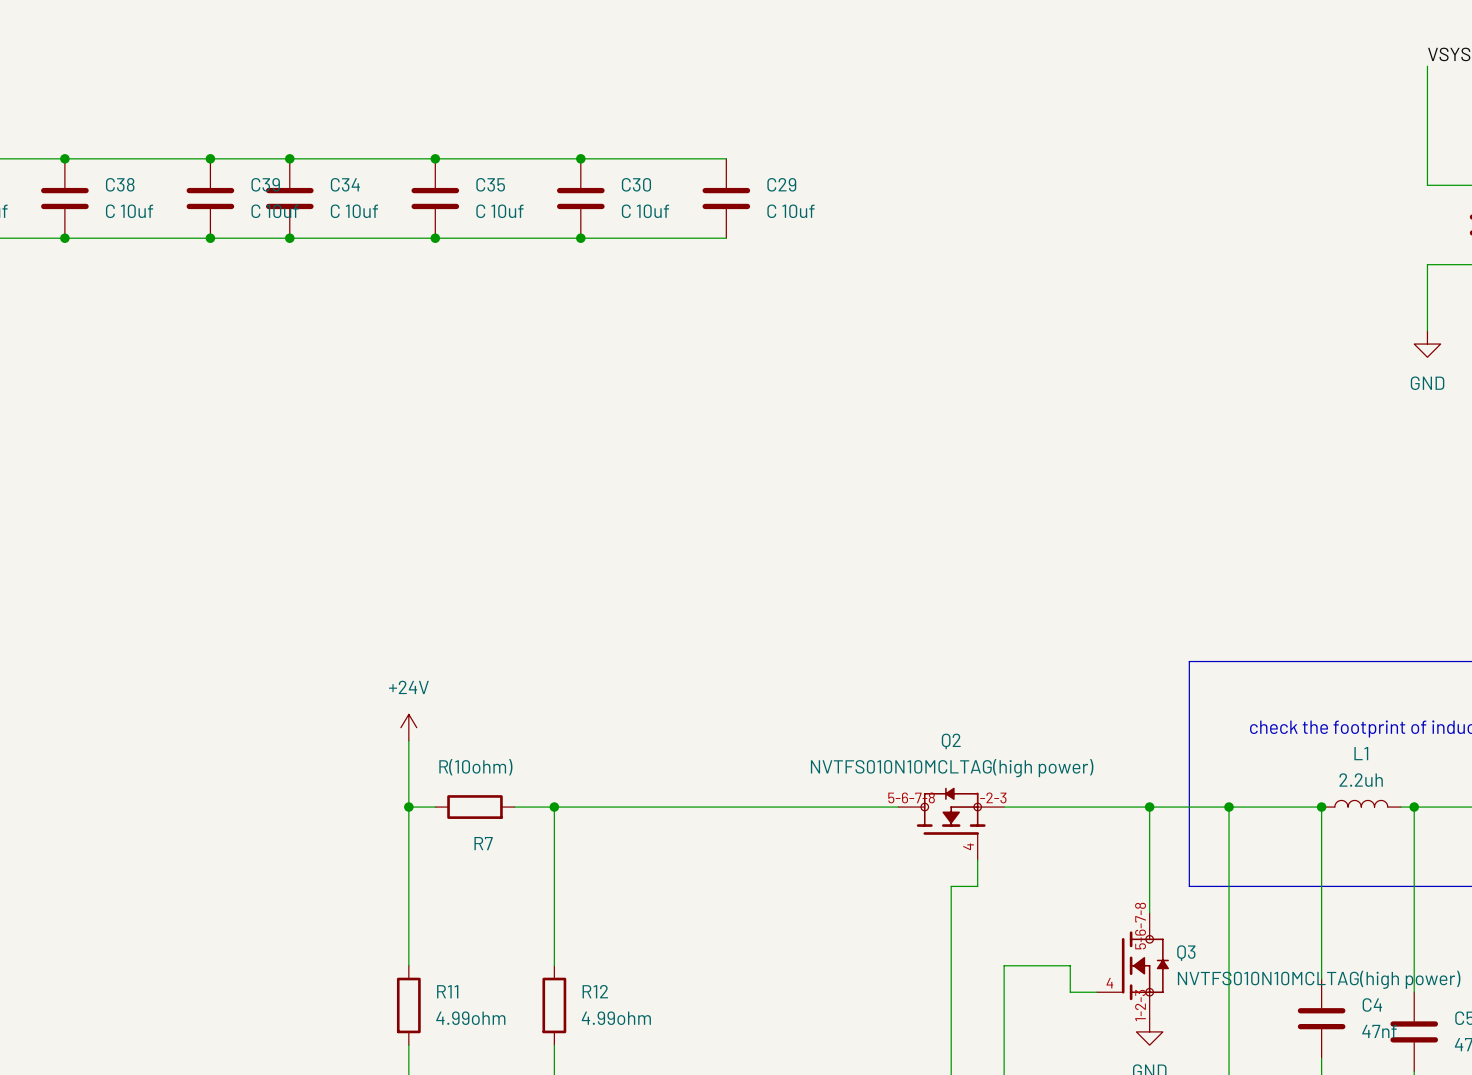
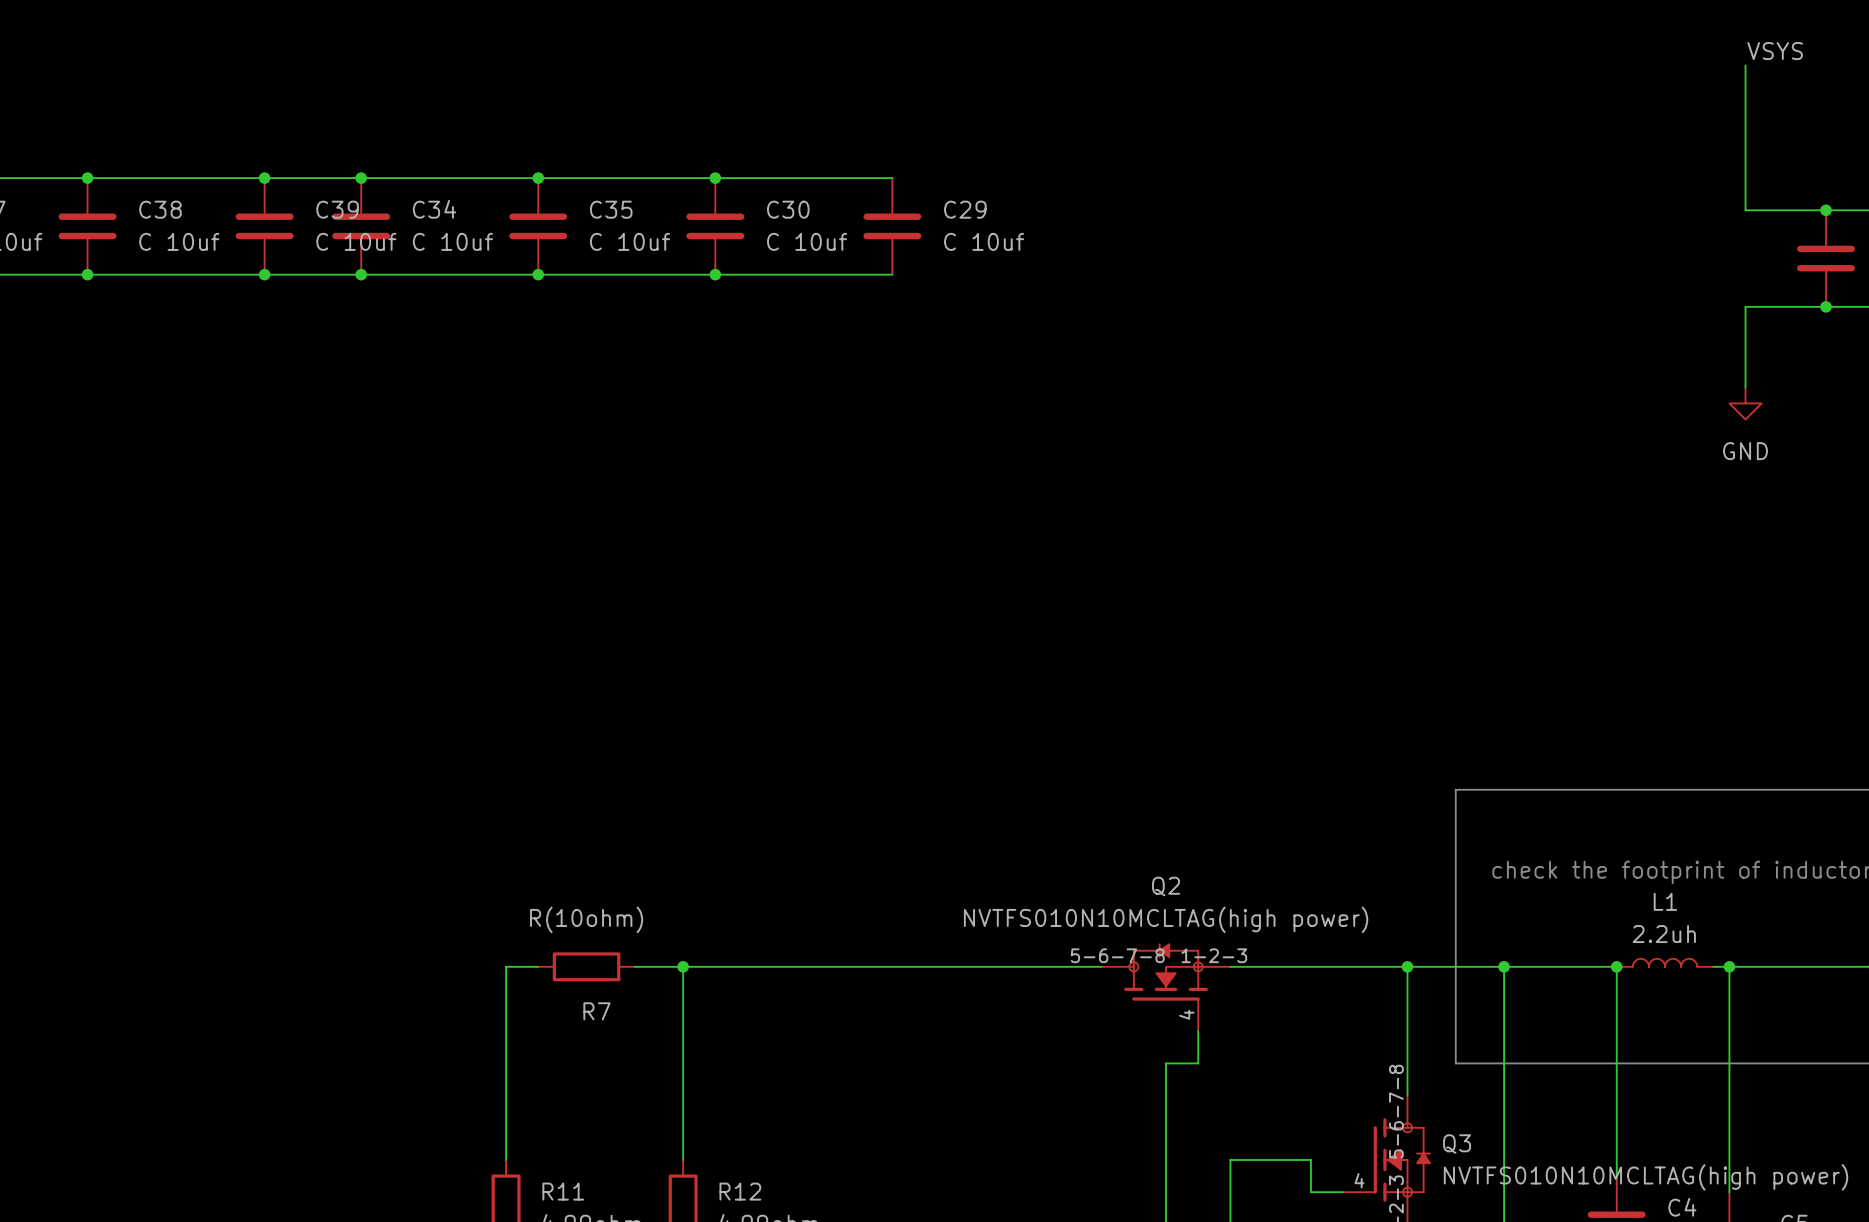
power symbol: +24V (408, 727) -> none
wire: (408, 740) (408, 807) -> none
junction: (408, 807) -> none

